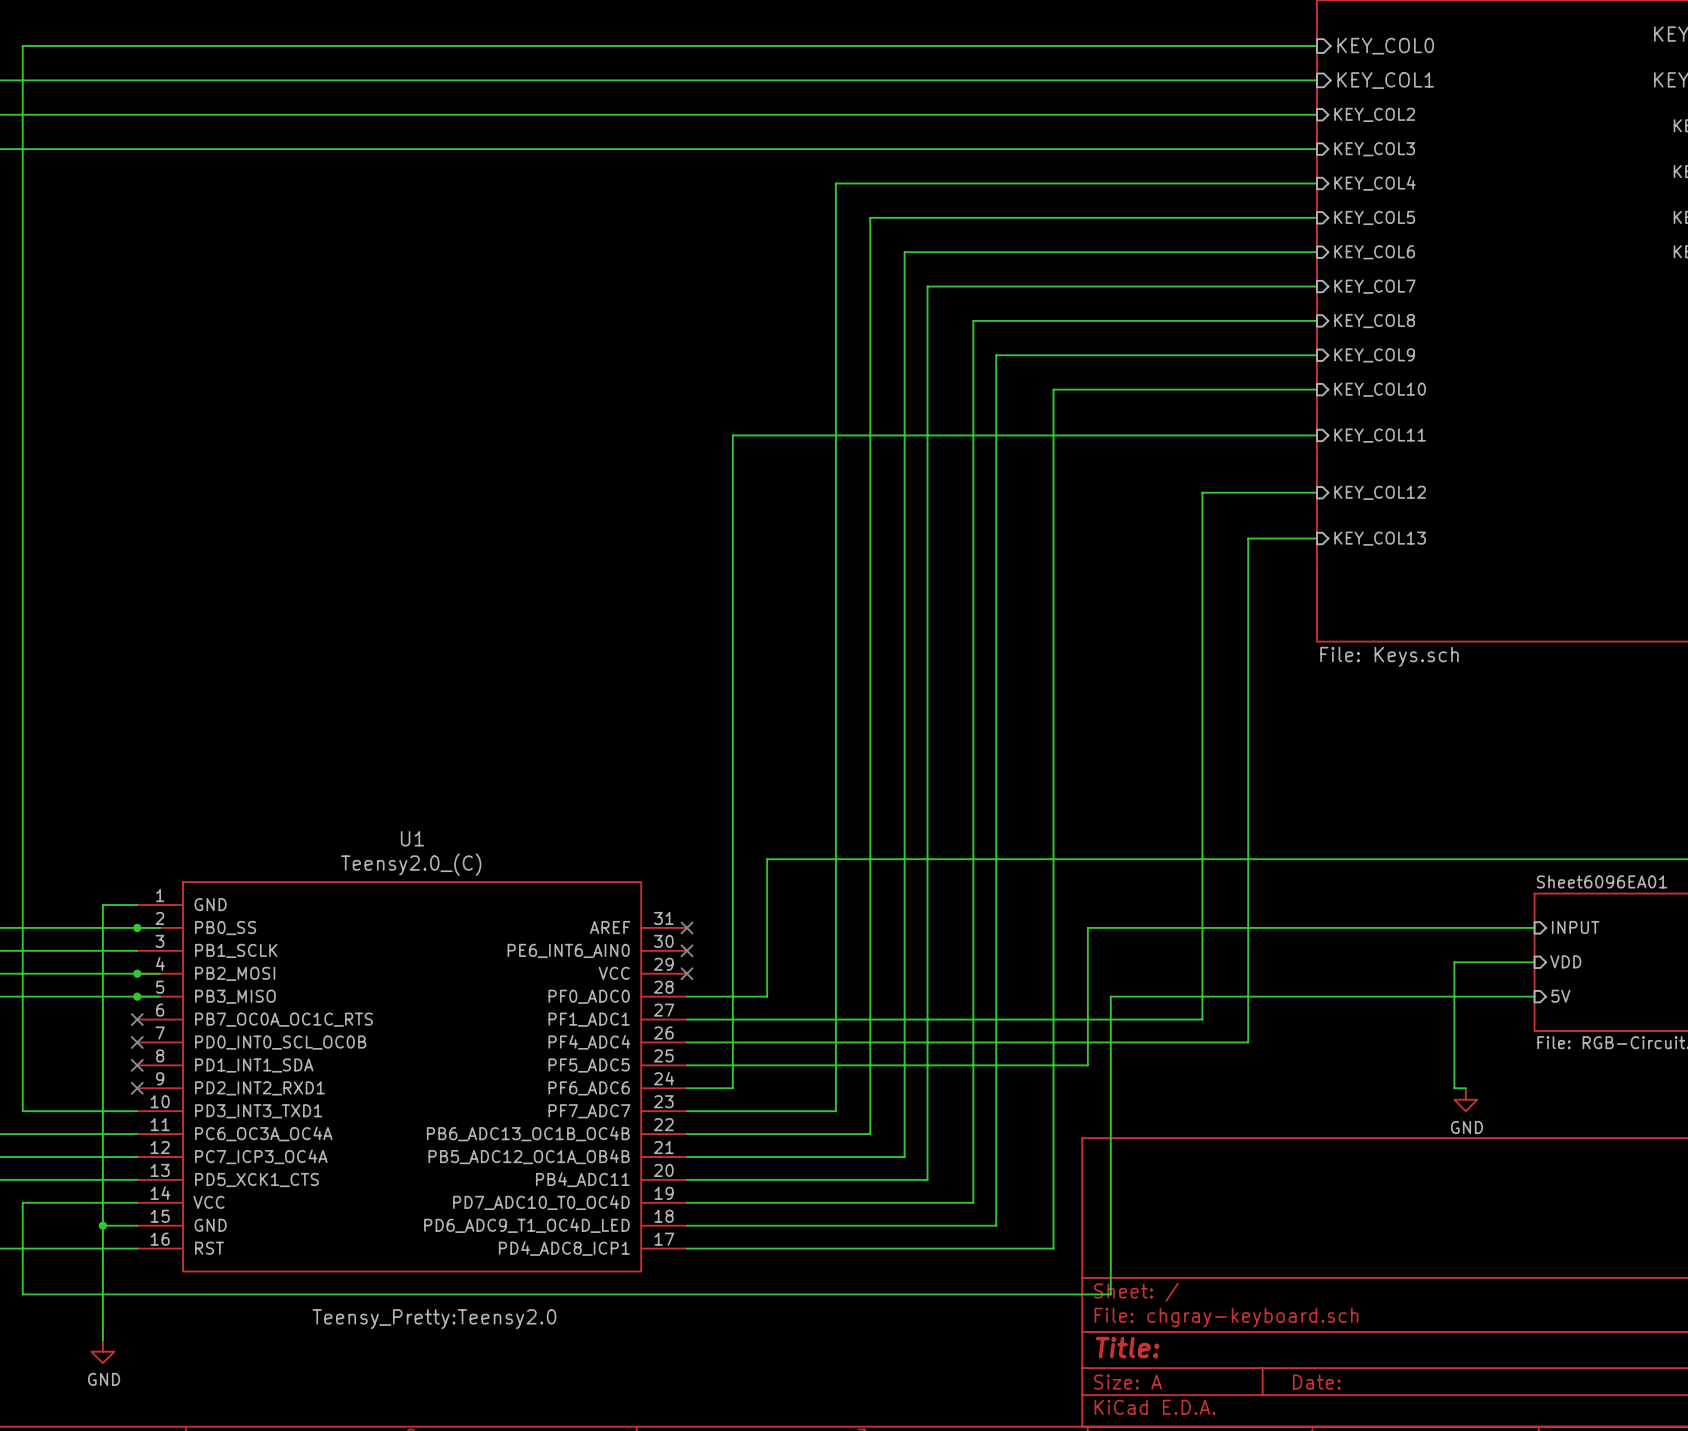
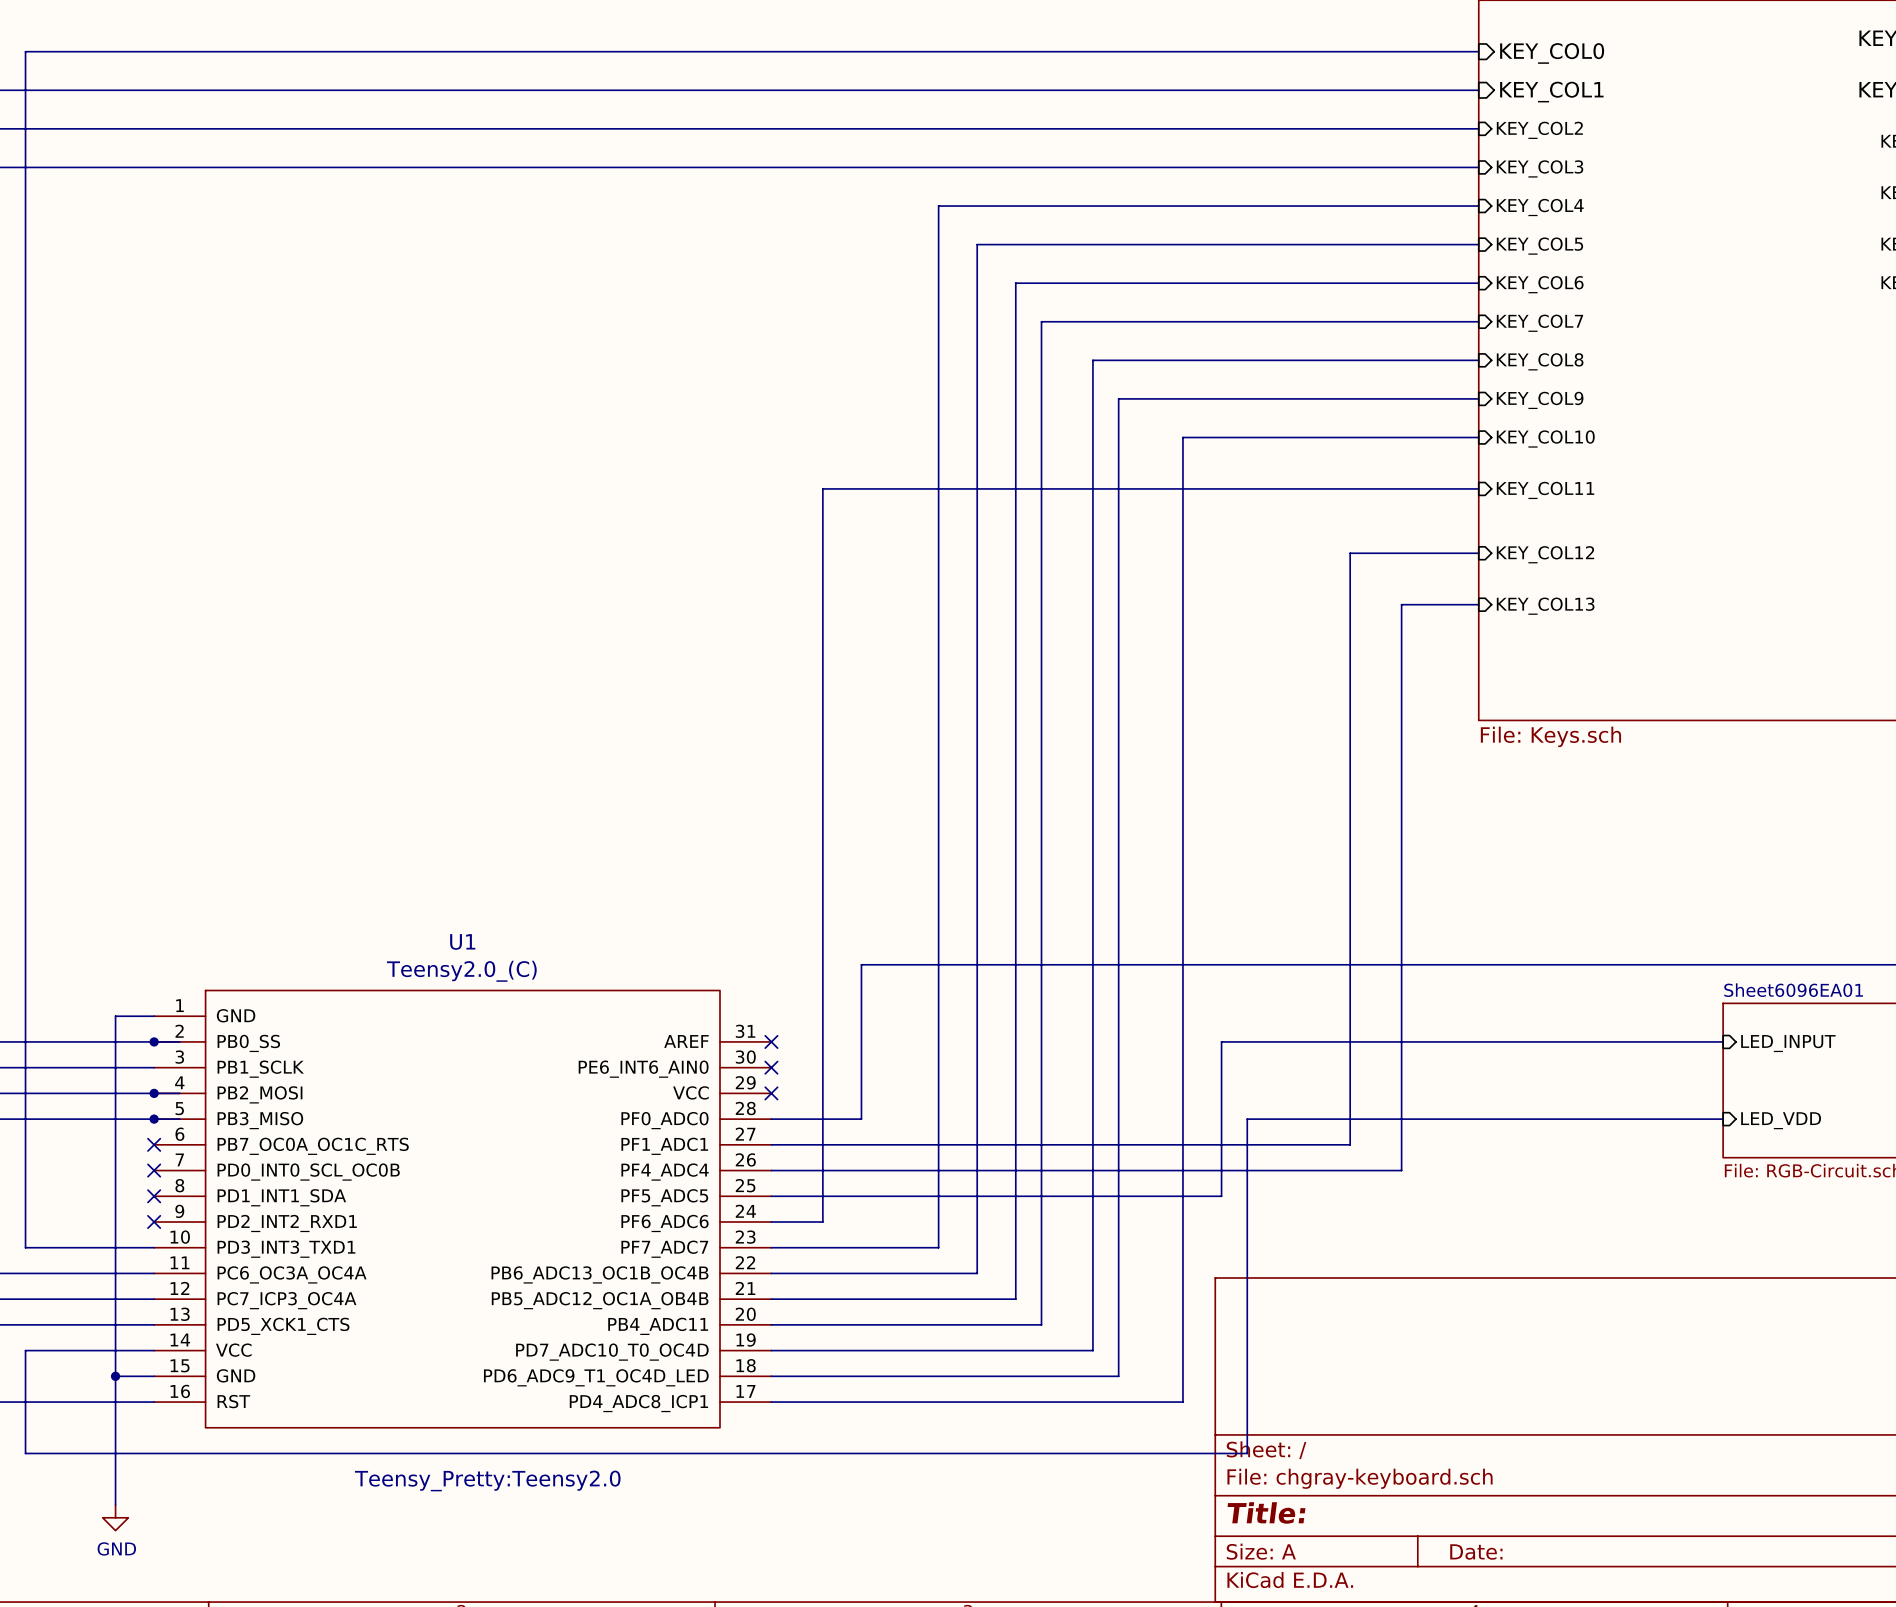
sheet pin: INPUT (1575, 927) -> LED_INPUT (1788, 1043)
sheet pin: VDD (1565, 961) -> none
wire: (1534, 962) (1454, 962) (1454, 1088) (1465, 1088) -> none
sheet pin: 5V (1560, 996) -> LED_VDD (1781, 1120)
power symbol: GND (1465, 1099) -> none

